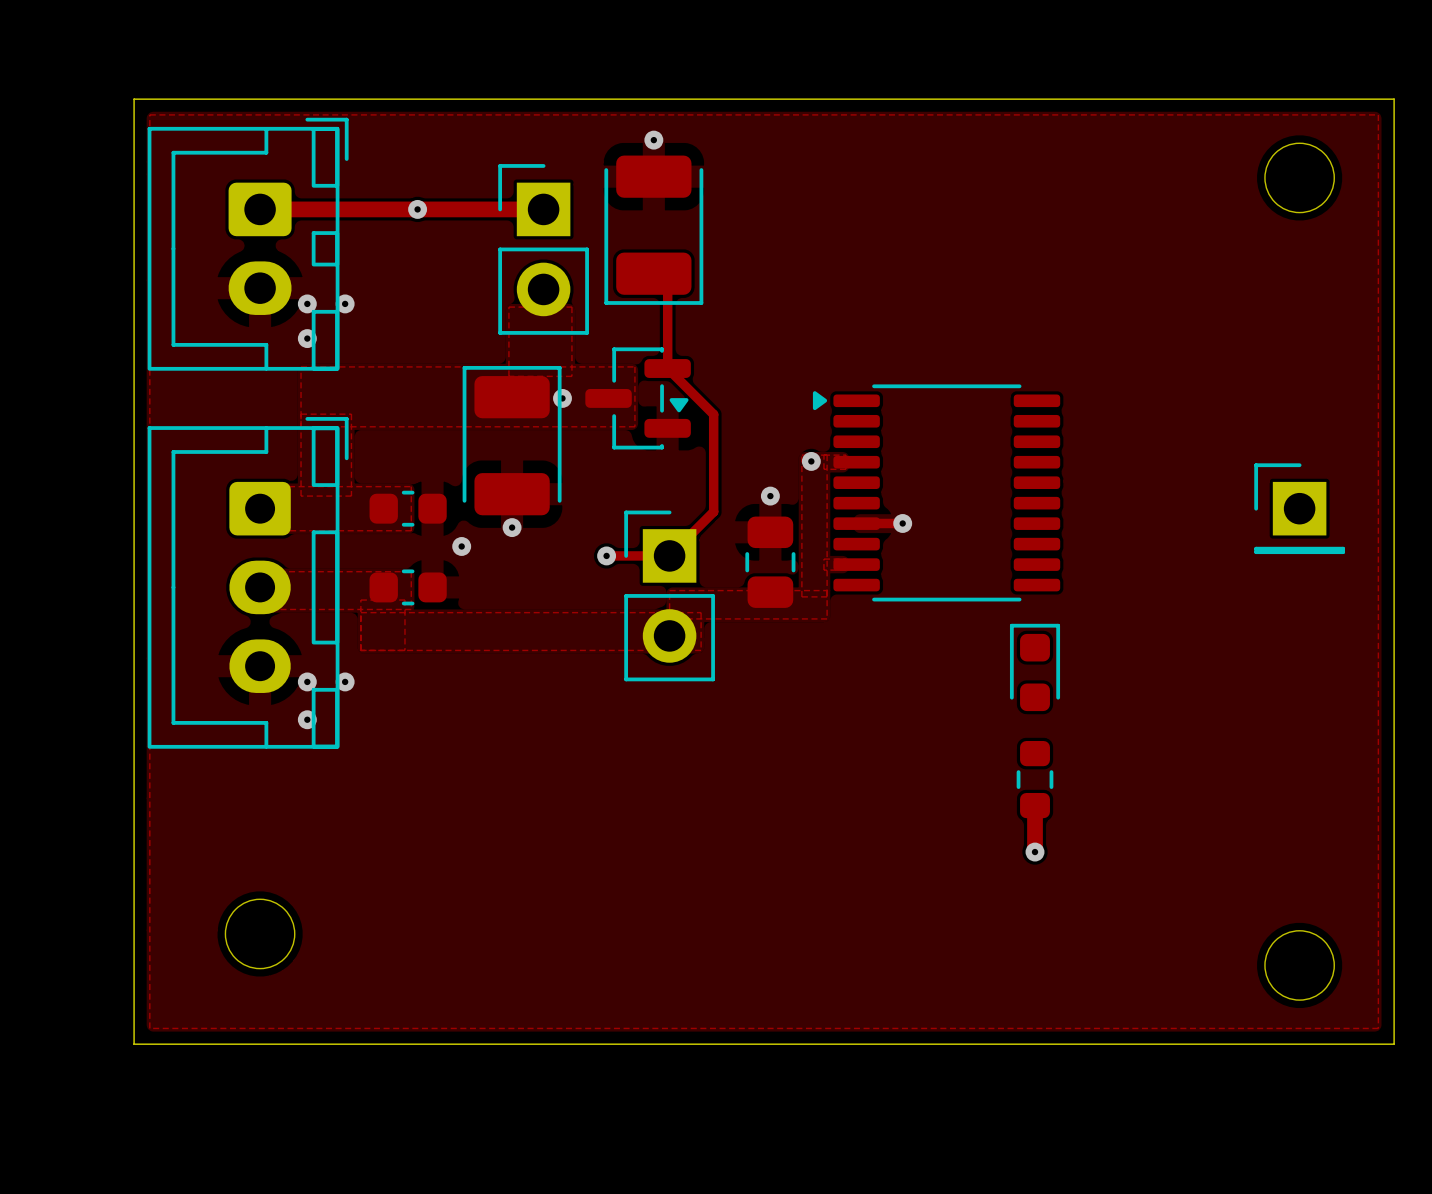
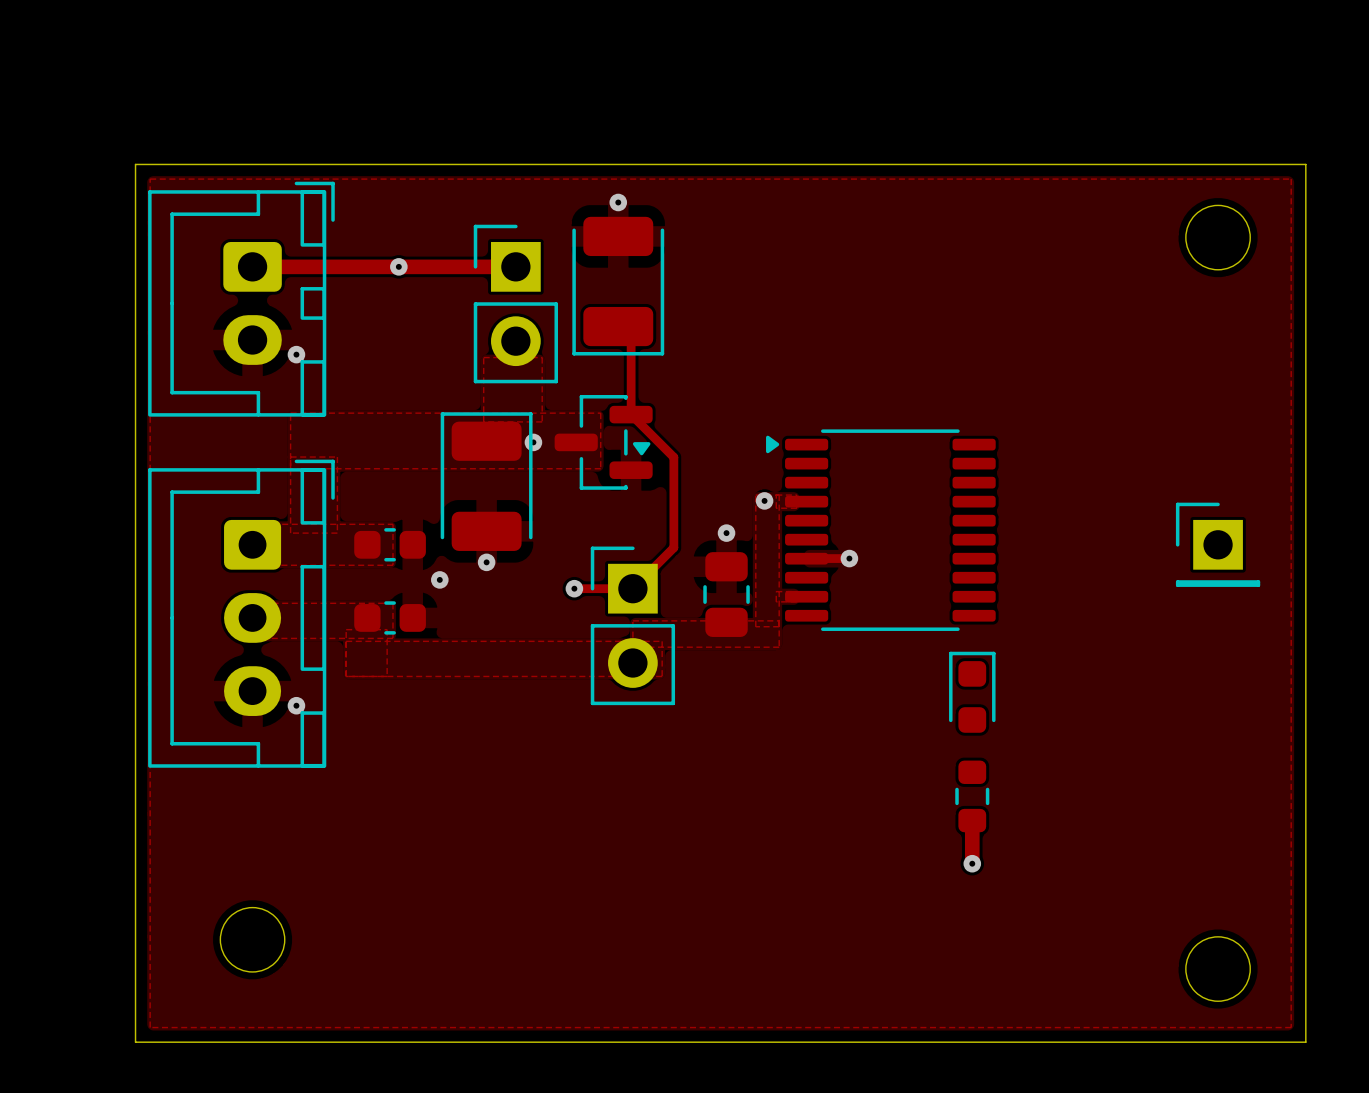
via: (345, 303) -> none
via: (307, 338) -> none
via: (345, 681) -> none
via: (307, 719) -> none

